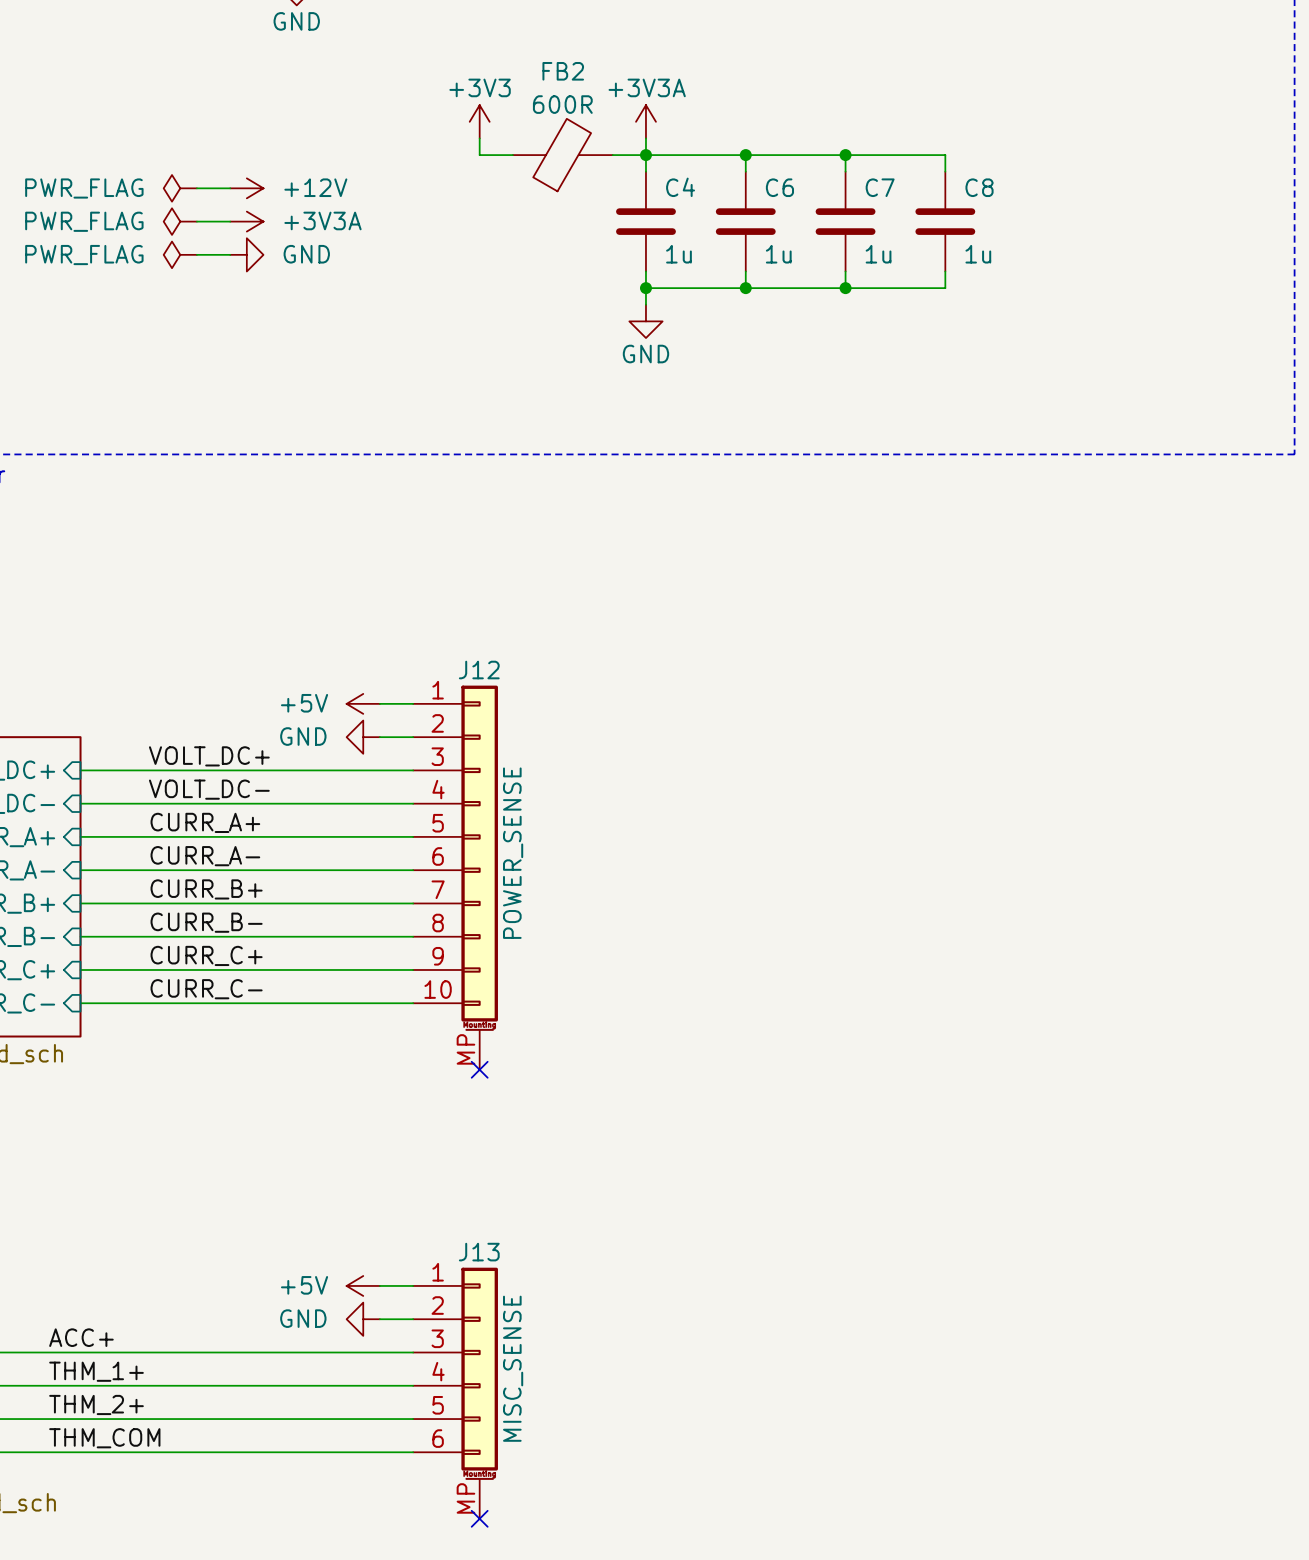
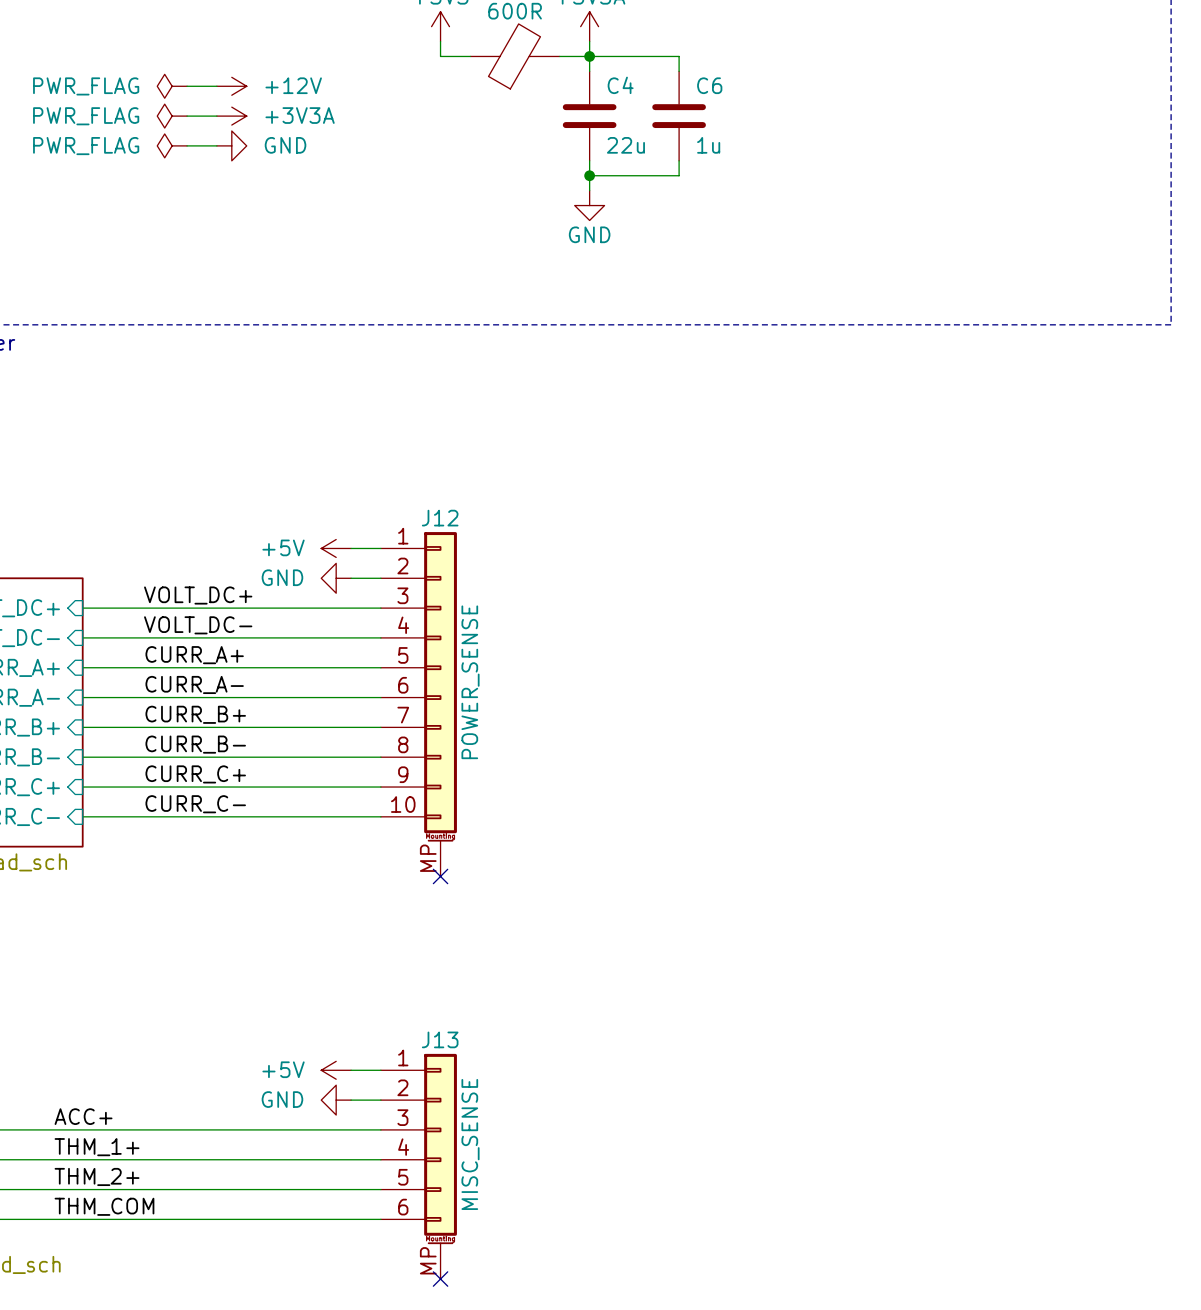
wire: (745, 155) (945, 155) (945, 171) -> none
junction: (745, 155) -> none
wire: (845, 155) (845, 171) -> none
junction: (845, 155) -> none
C7: 1u (845, 221) -> none
C8: 1u (945, 221) -> none
C4 value: 1u (678, 254) -> 22u (625, 145)
wire: (845, 271) (845, 288) -> none
wire: (945, 271) (945, 288) (745, 288) -> none
junction: (745, 288) -> none
junction: (845, 288) -> none

